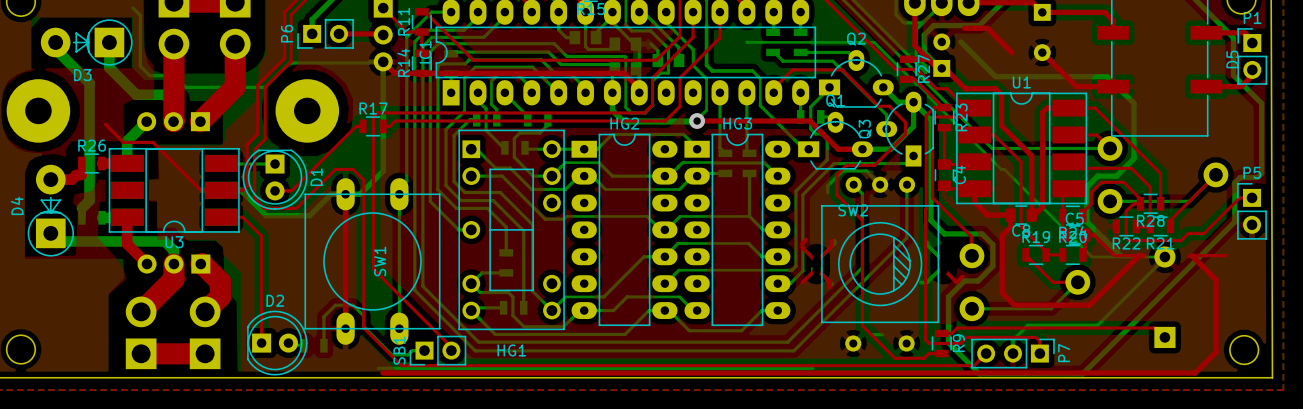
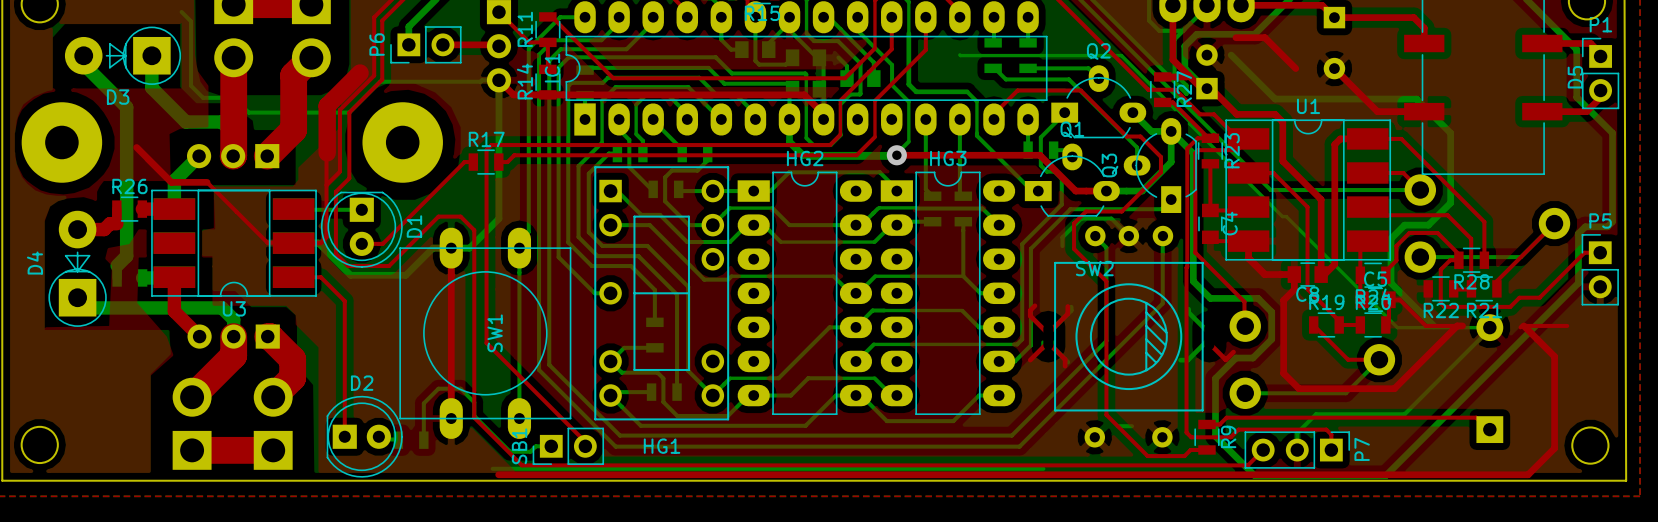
top track: (235, 44) (235, 86) (221, 100) -> (311, 57) (293, 75) (293, 129)
top track: none -> (360, 73) (327, 105) (327, 152)
top track: none -> (136, 147) (171, 182) (207, 182)
top track: none -> (326, 153) (326, 185)

